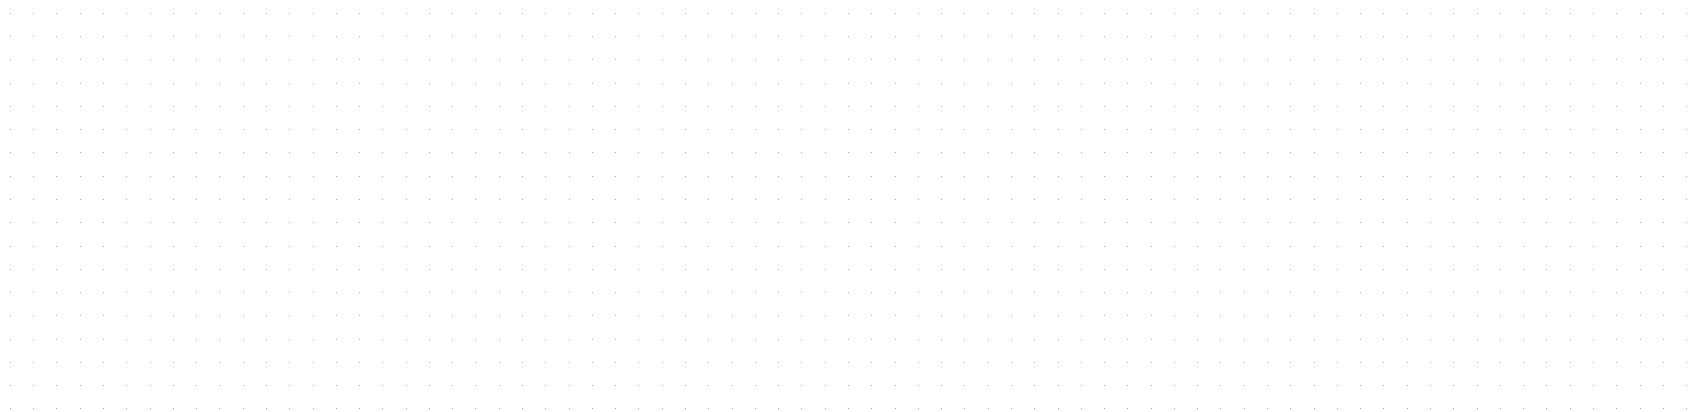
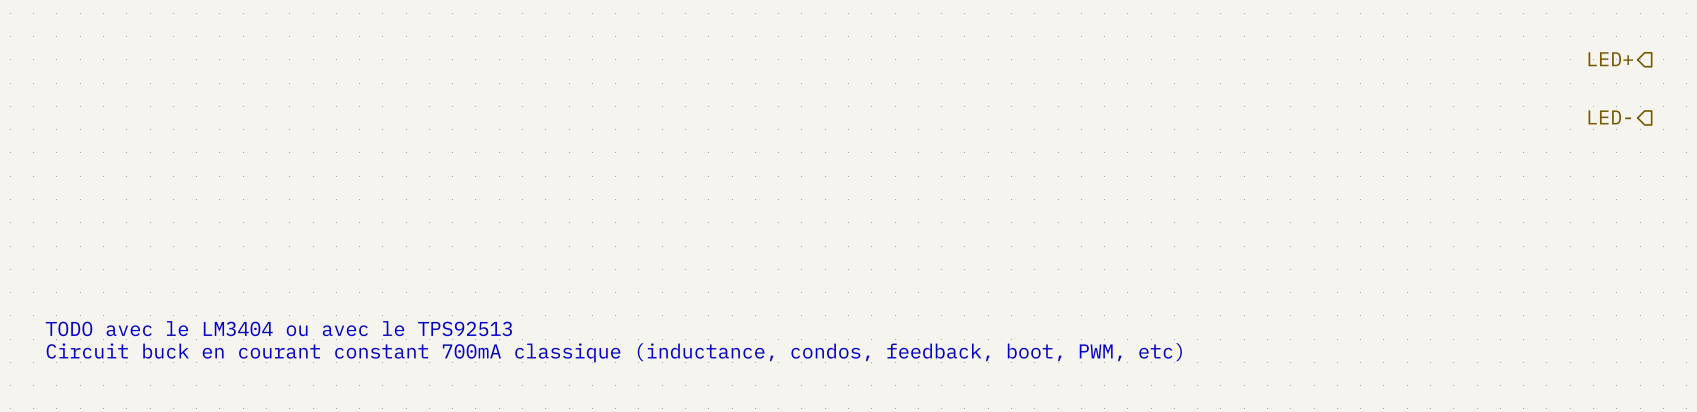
hierarchical label: none -> LED+ (1610, 59)
hierarchical label: none -> LED- (1609, 117)
text: none -> TODO avec le LM3404 ou avec le TPS92513 (278, 328)
text: none -> Circuit buck en courant constant 700mA classique (inductance, condos, feedback, boot, PWM, etc) (614, 352)

